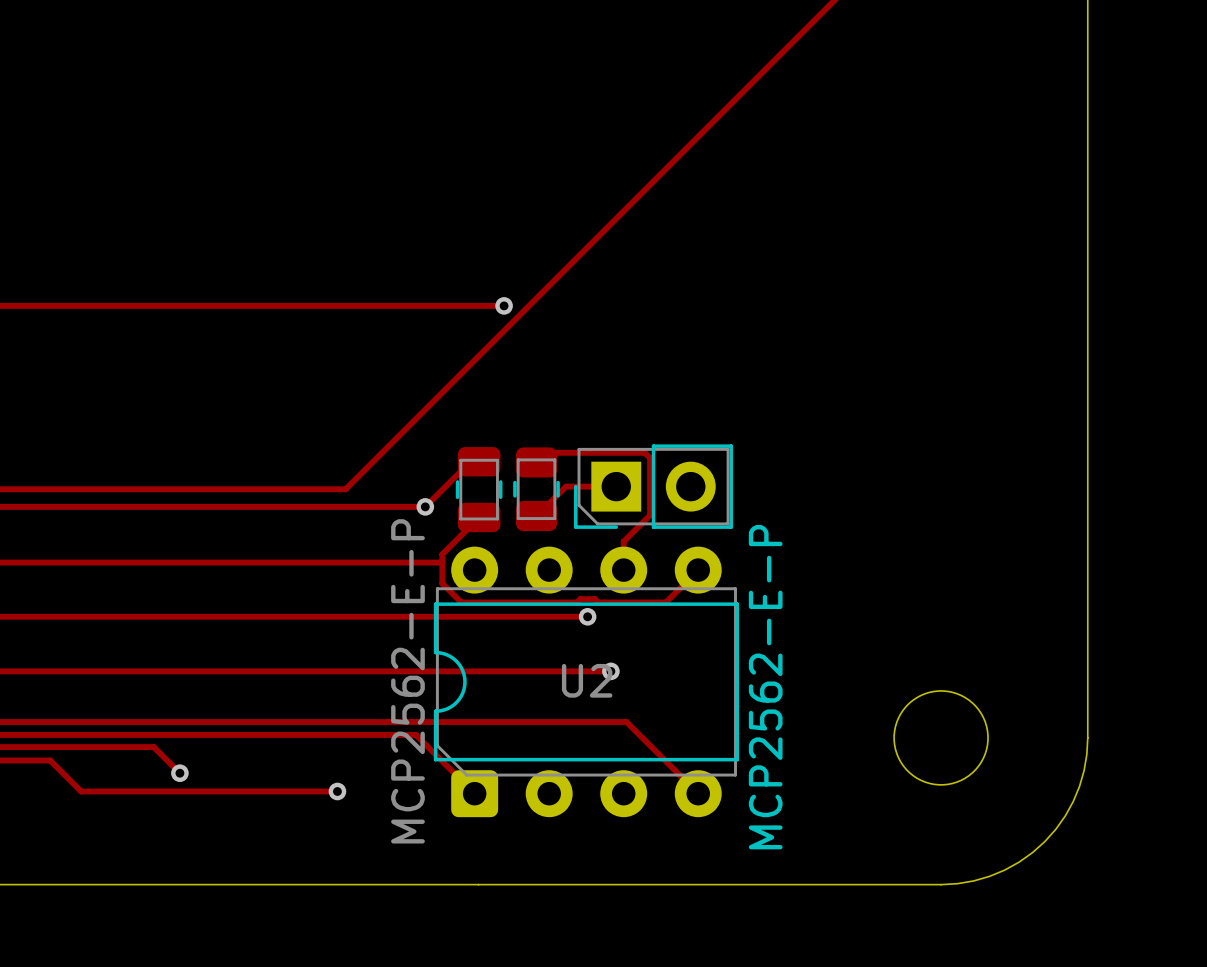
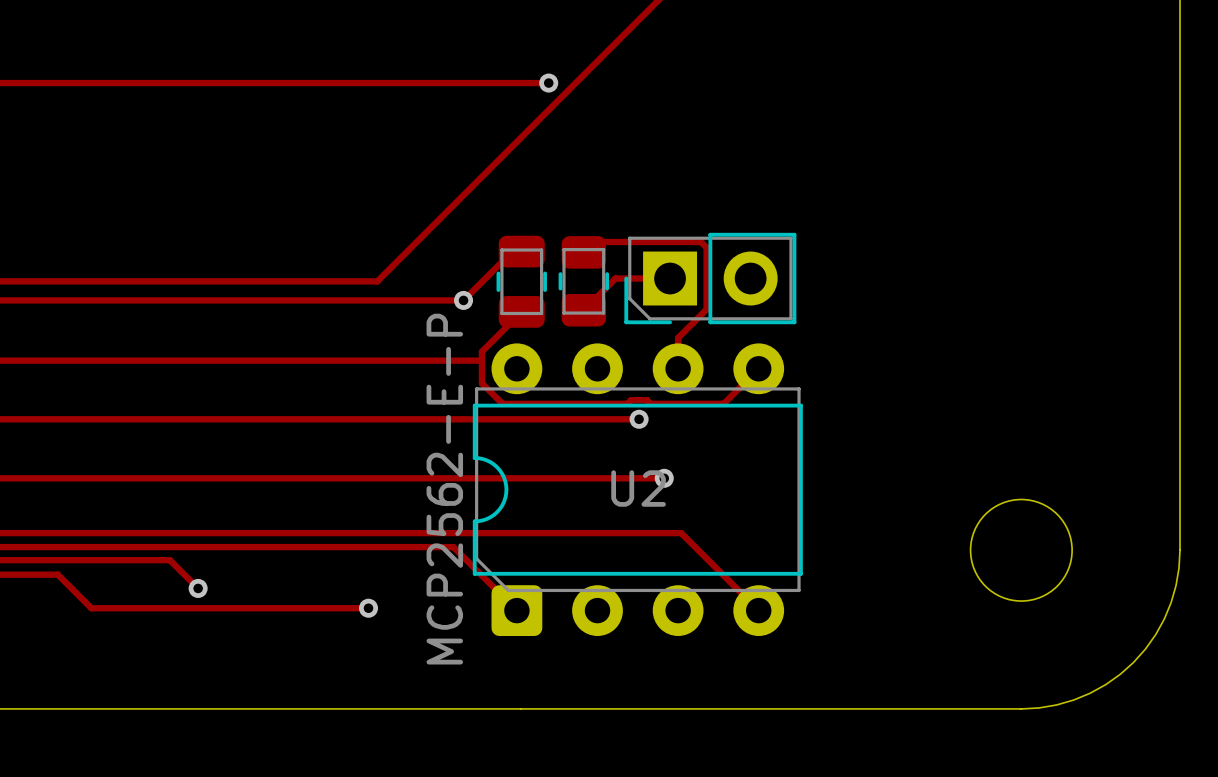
text: MCP2562-E-P (765, 687) -> none

